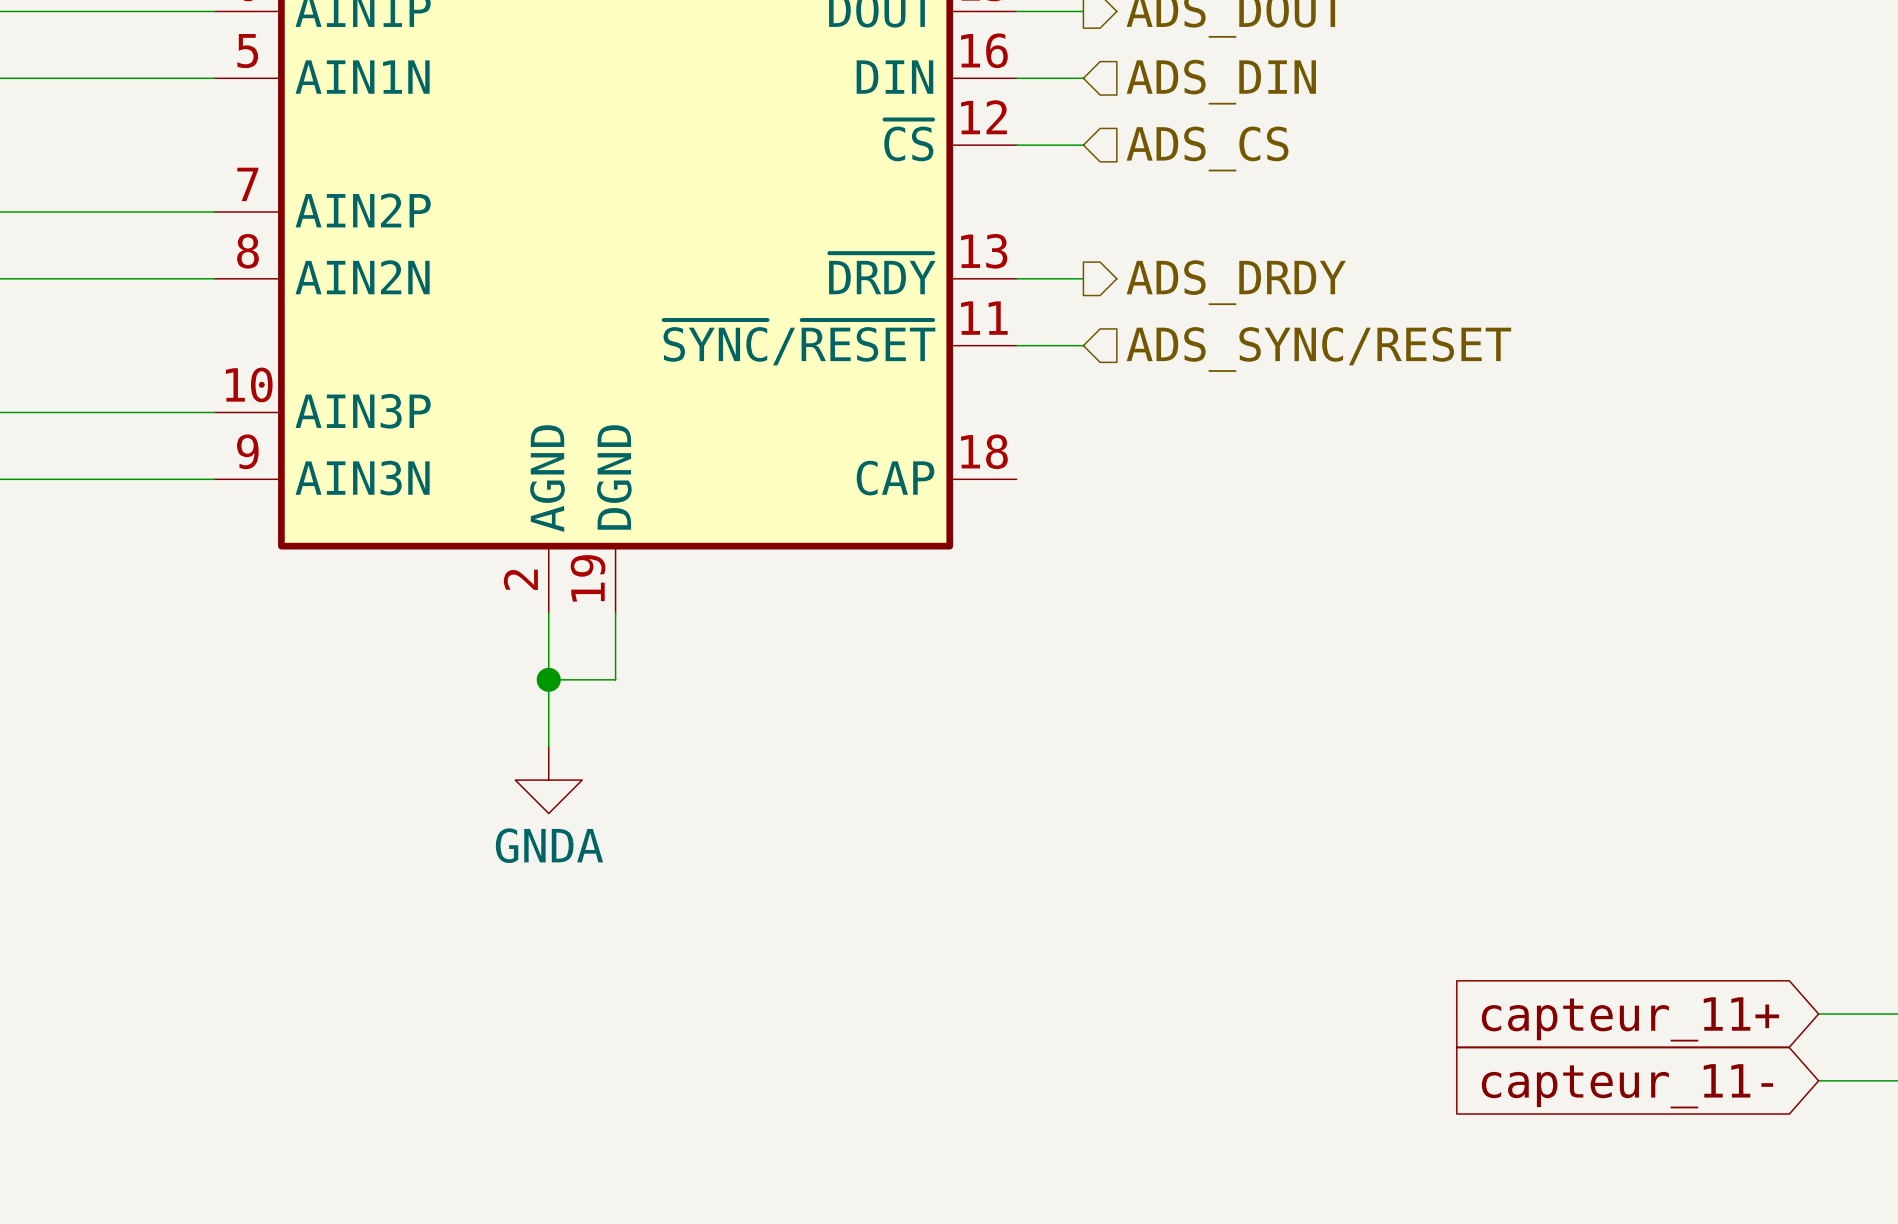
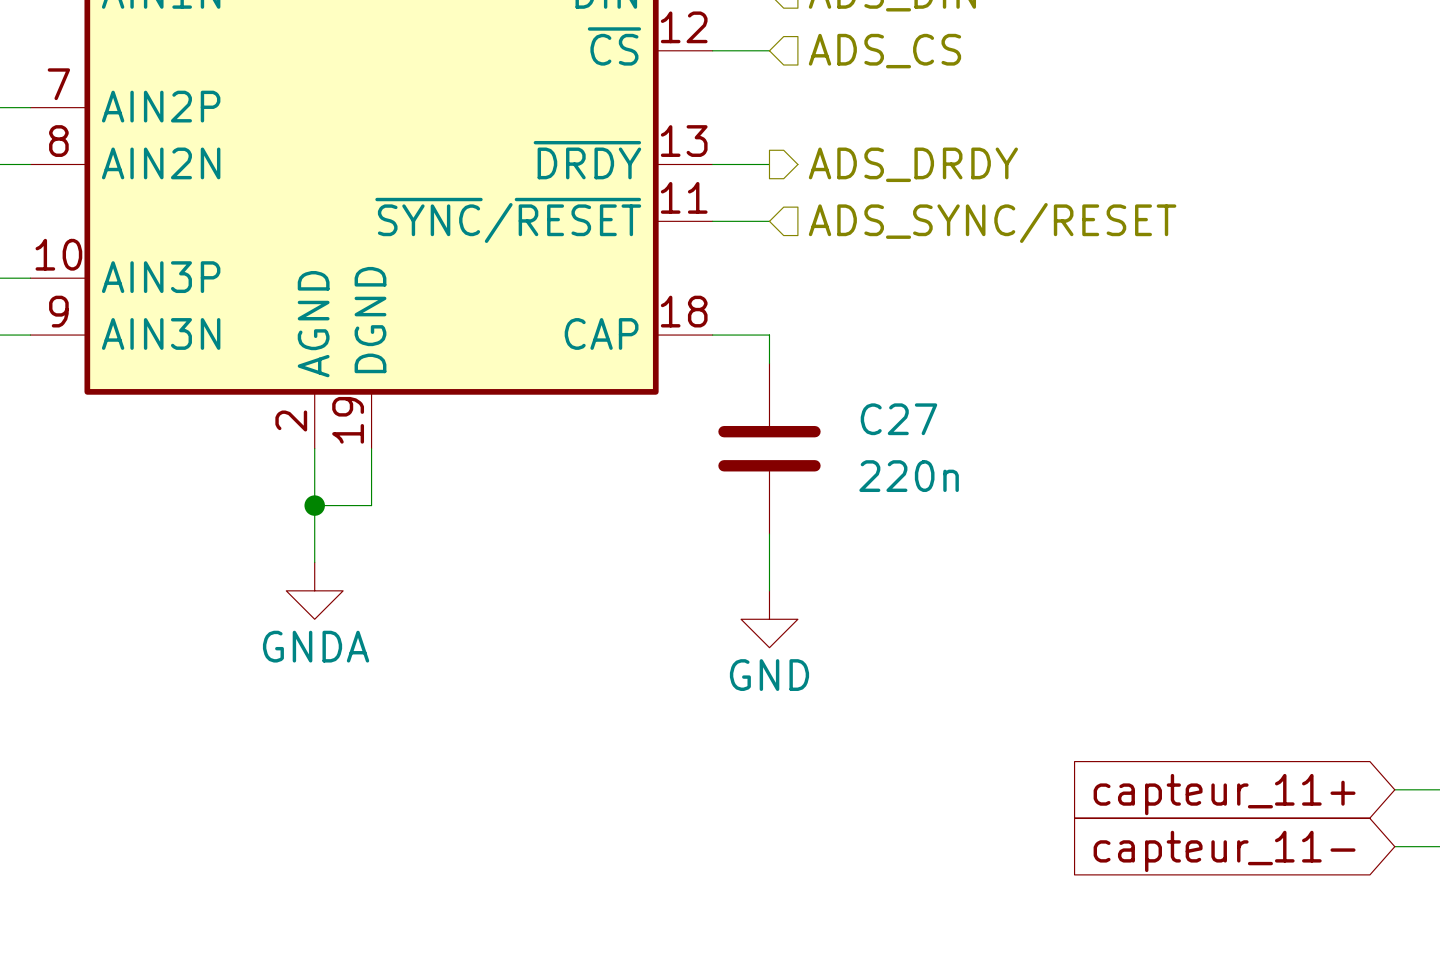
wire: none -> (712, 335) (769, 335) (769, 363)
C27: none -> 220n (769, 448)
wire: none -> (769, 534) (769, 590)
power symbol: none -> GND (769, 619)

